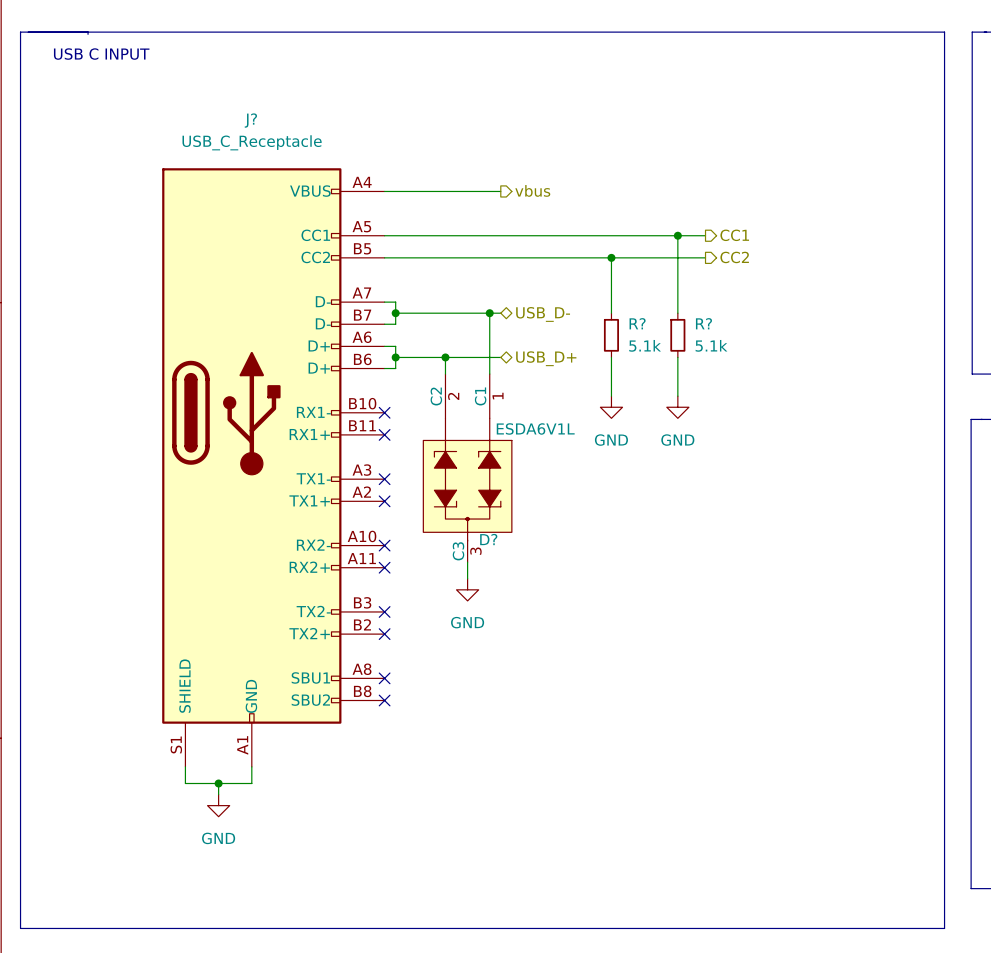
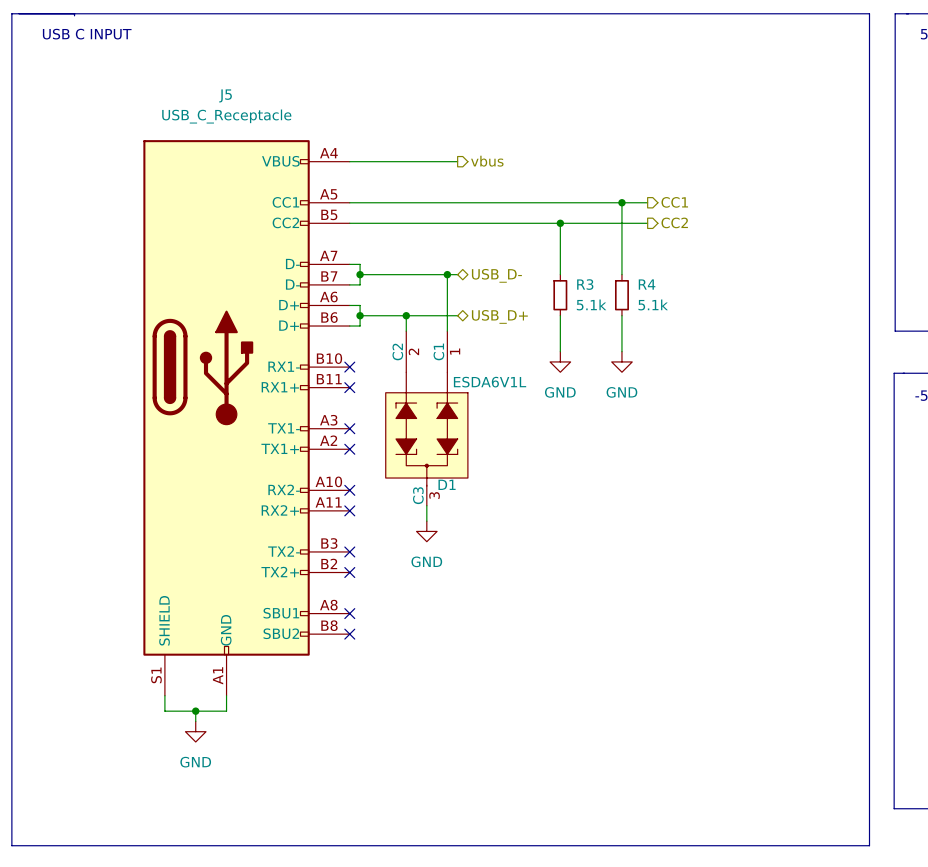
J? name: J? (250, 120) -> J5 (225, 95)
R? name: R? (637, 323) -> R3 (585, 284)
R? name: R? (703, 323) -> R4 (647, 284)
D? name: D? (488, 539) -> D1 (447, 484)

